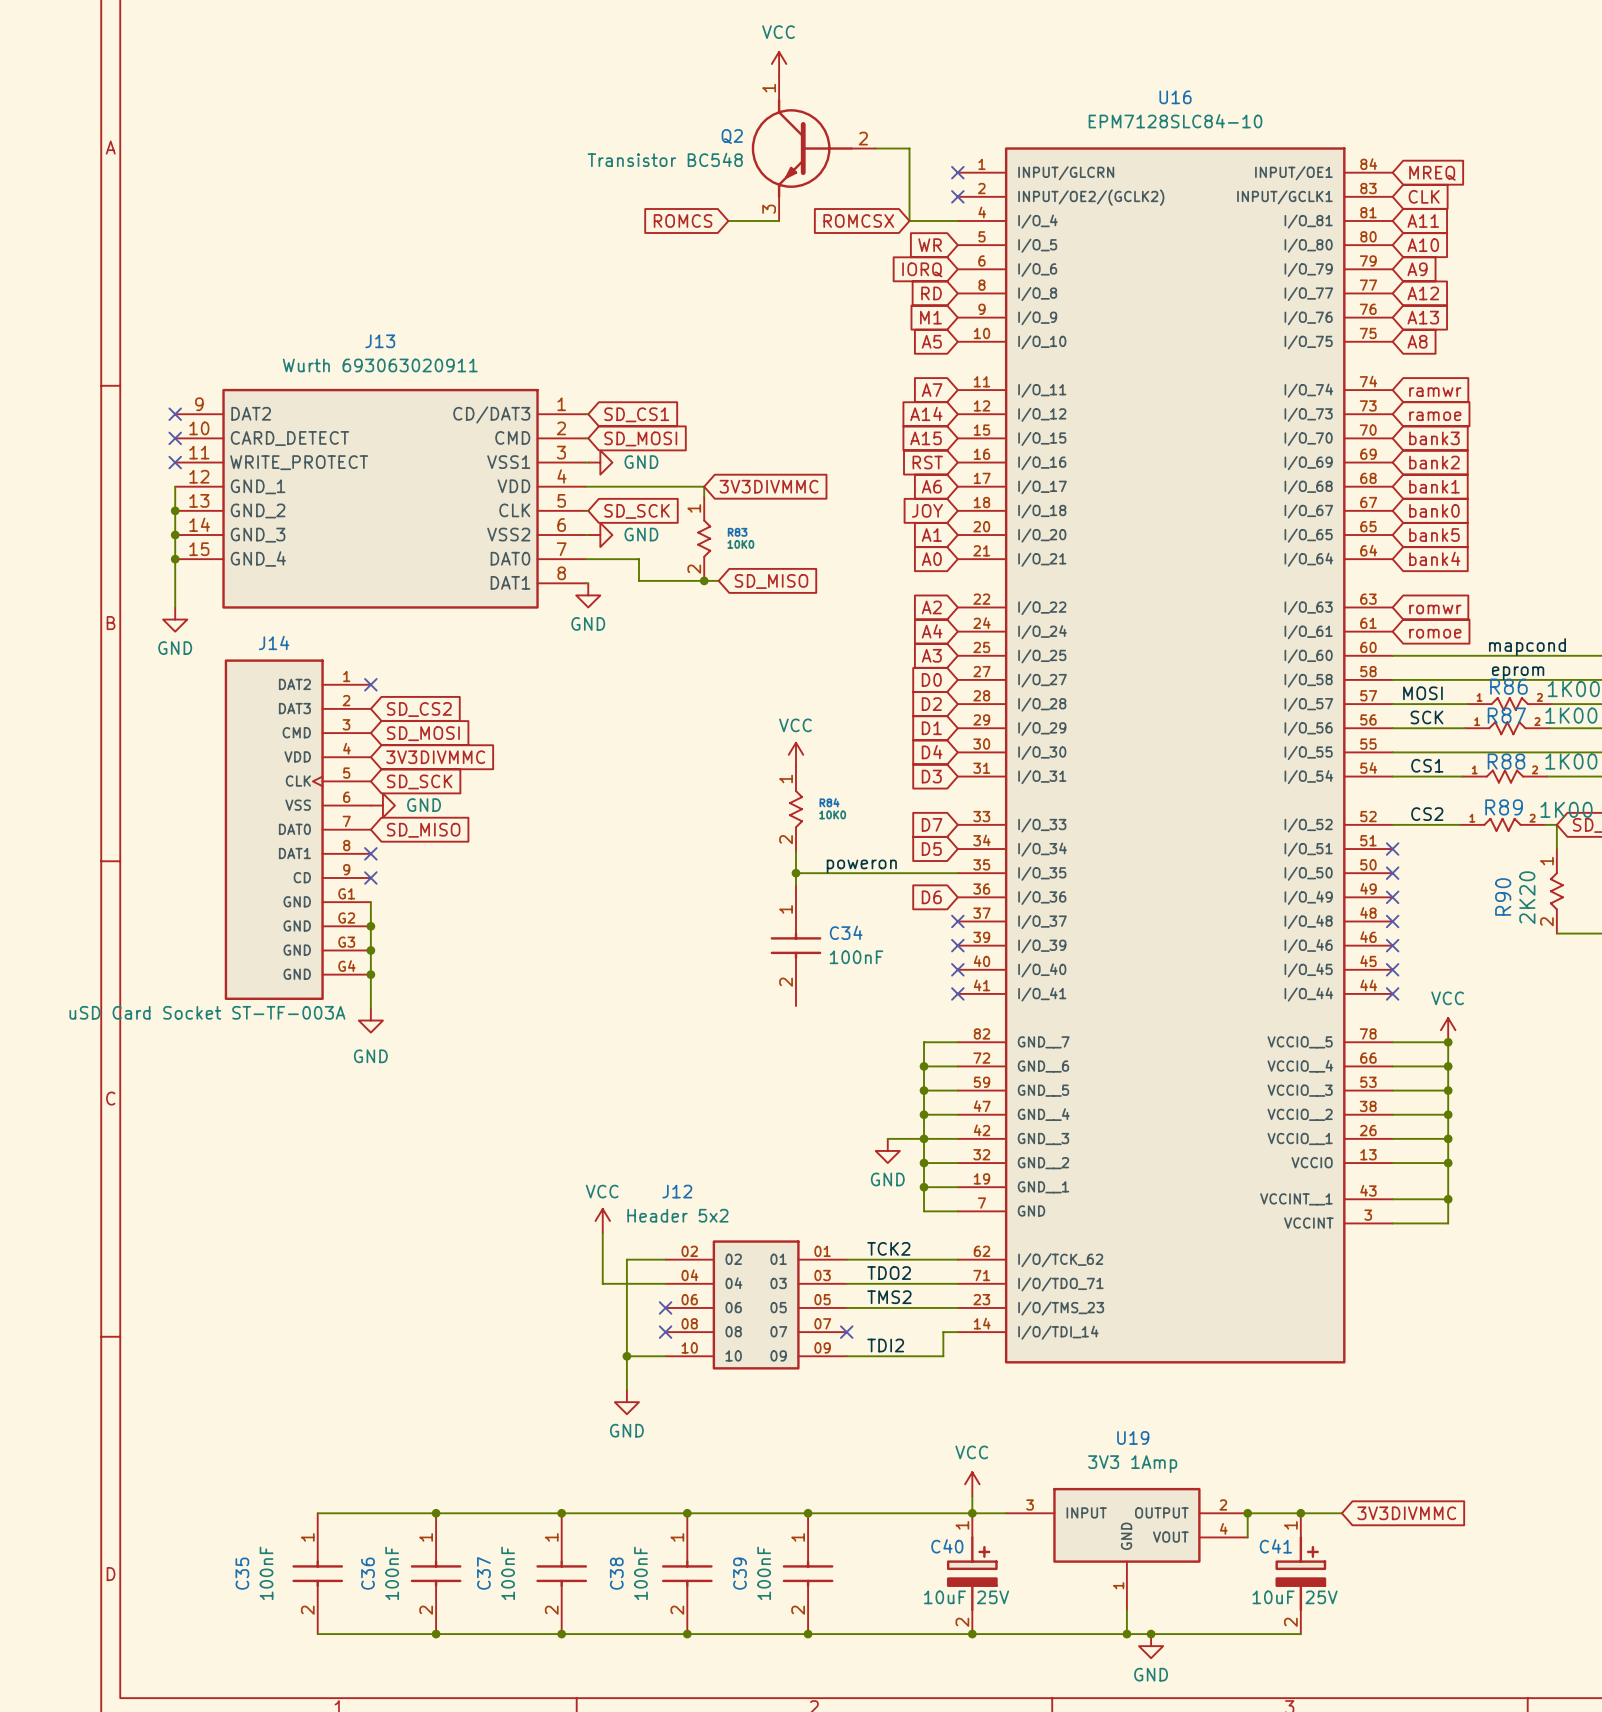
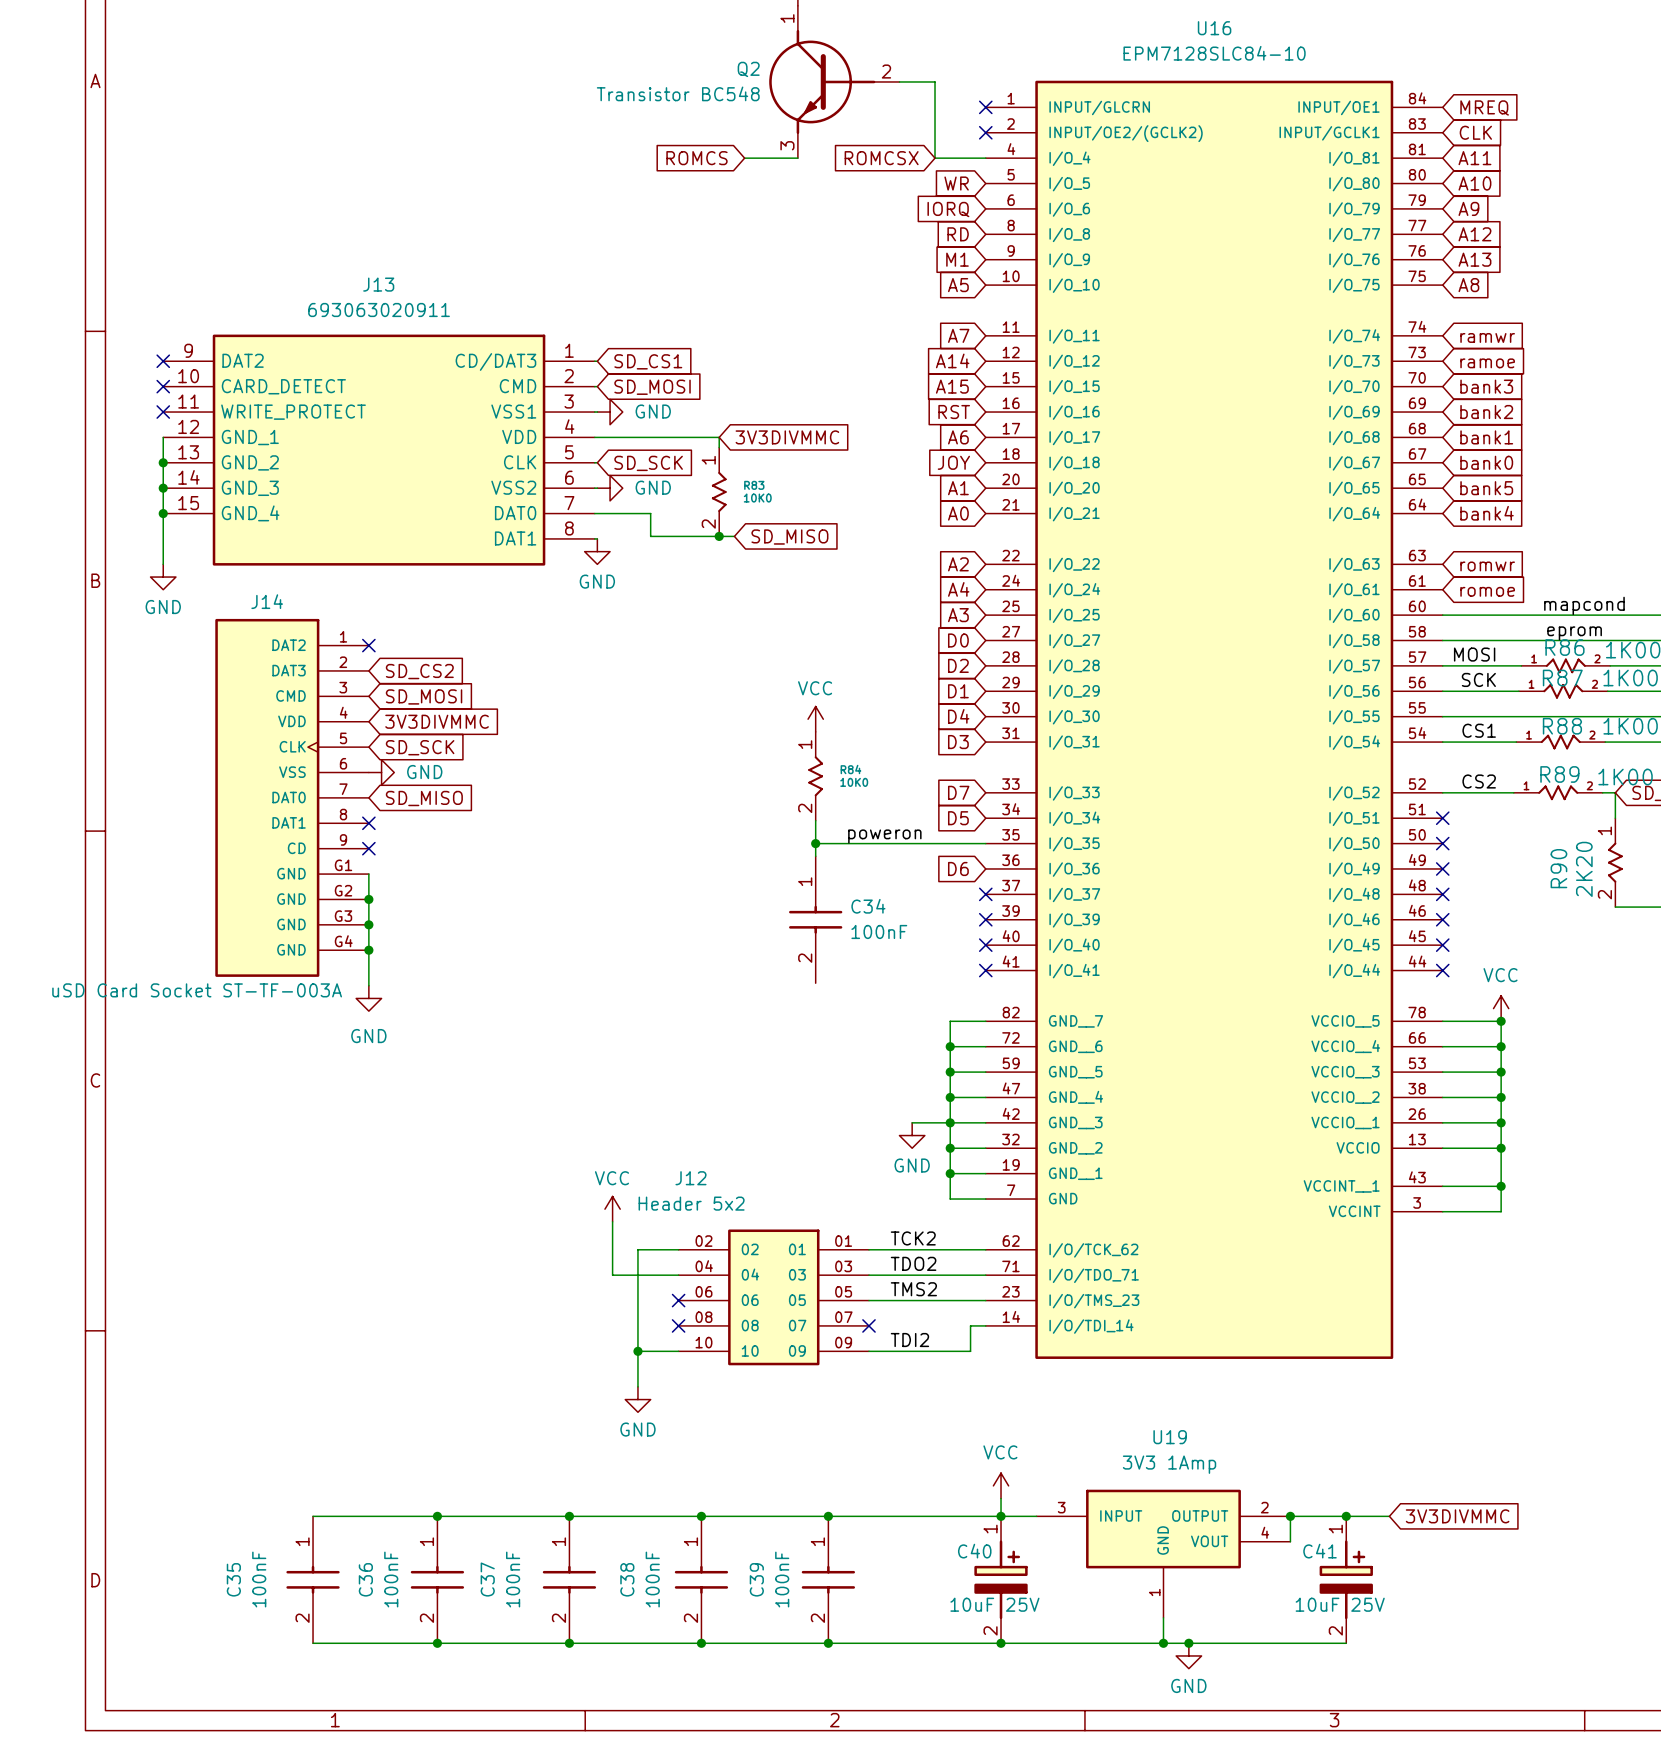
J13 value: Wurth 693063020911 (380, 365) -> 693063020911 (379, 309)

